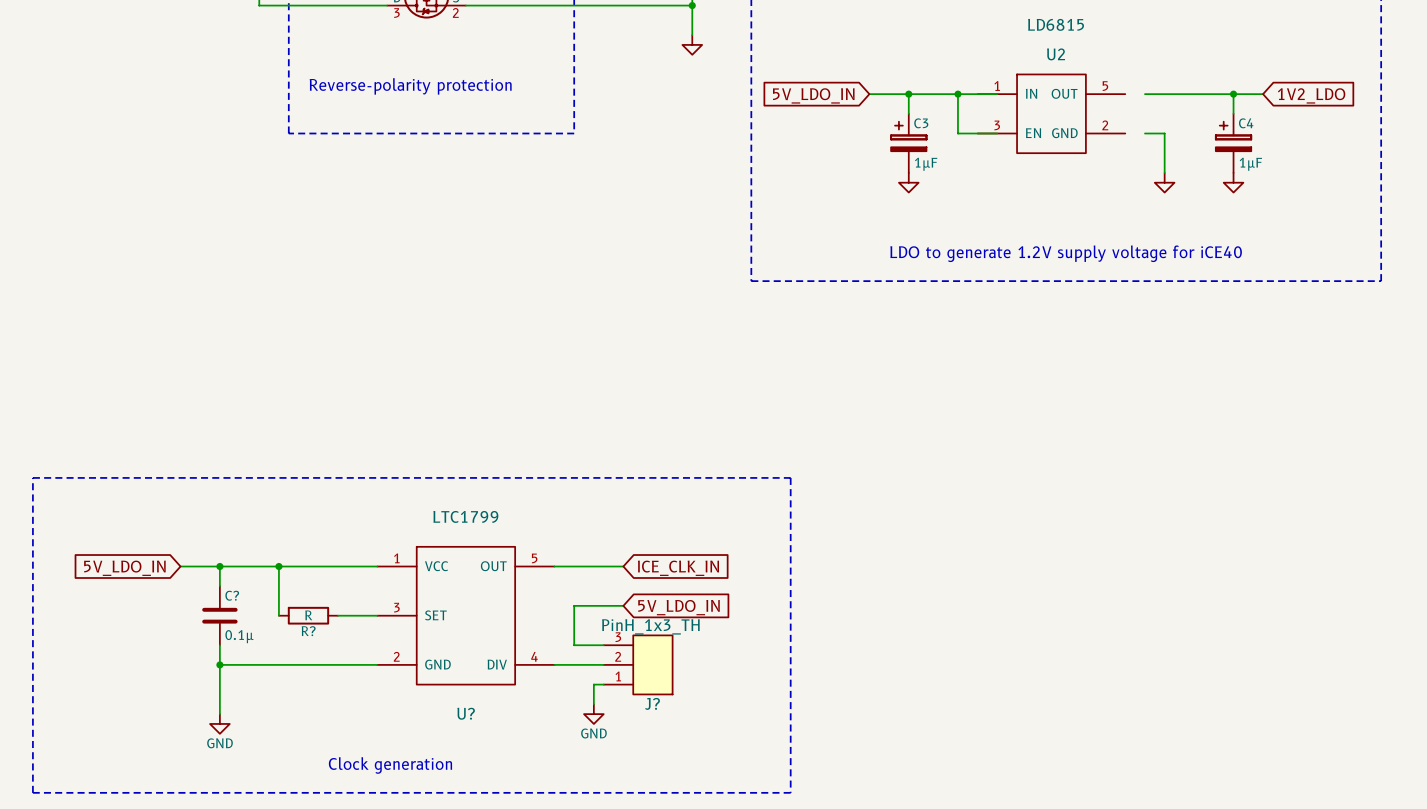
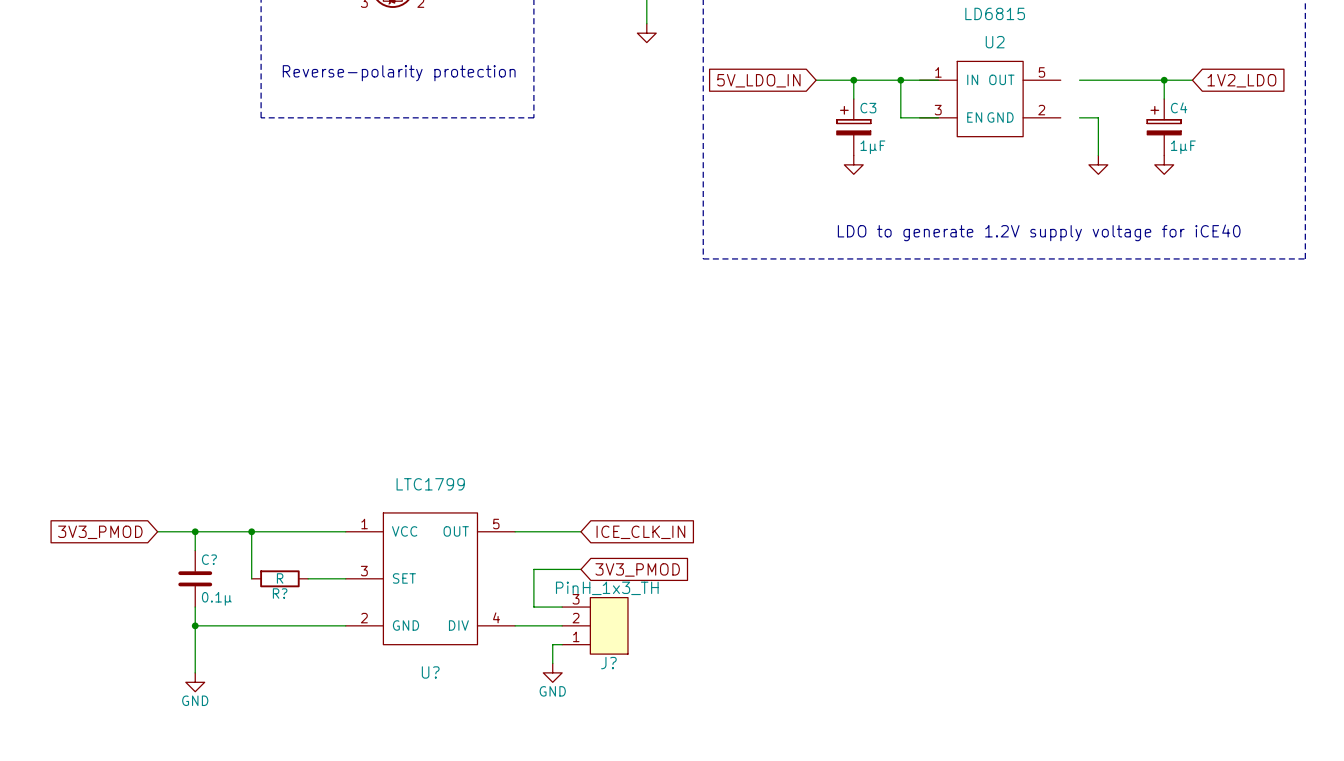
line: (32, 477) (790, 477) (790, 792) (32, 792) (32, 477) -> none
global label: 5V_LDO_IN (124, 568) -> 3V3_PMOD (100, 532)
global label: 5V_LDO_IN (679, 607) -> 3V3_PMOD (637, 569)
text: Clock generation (390, 765) -> none

